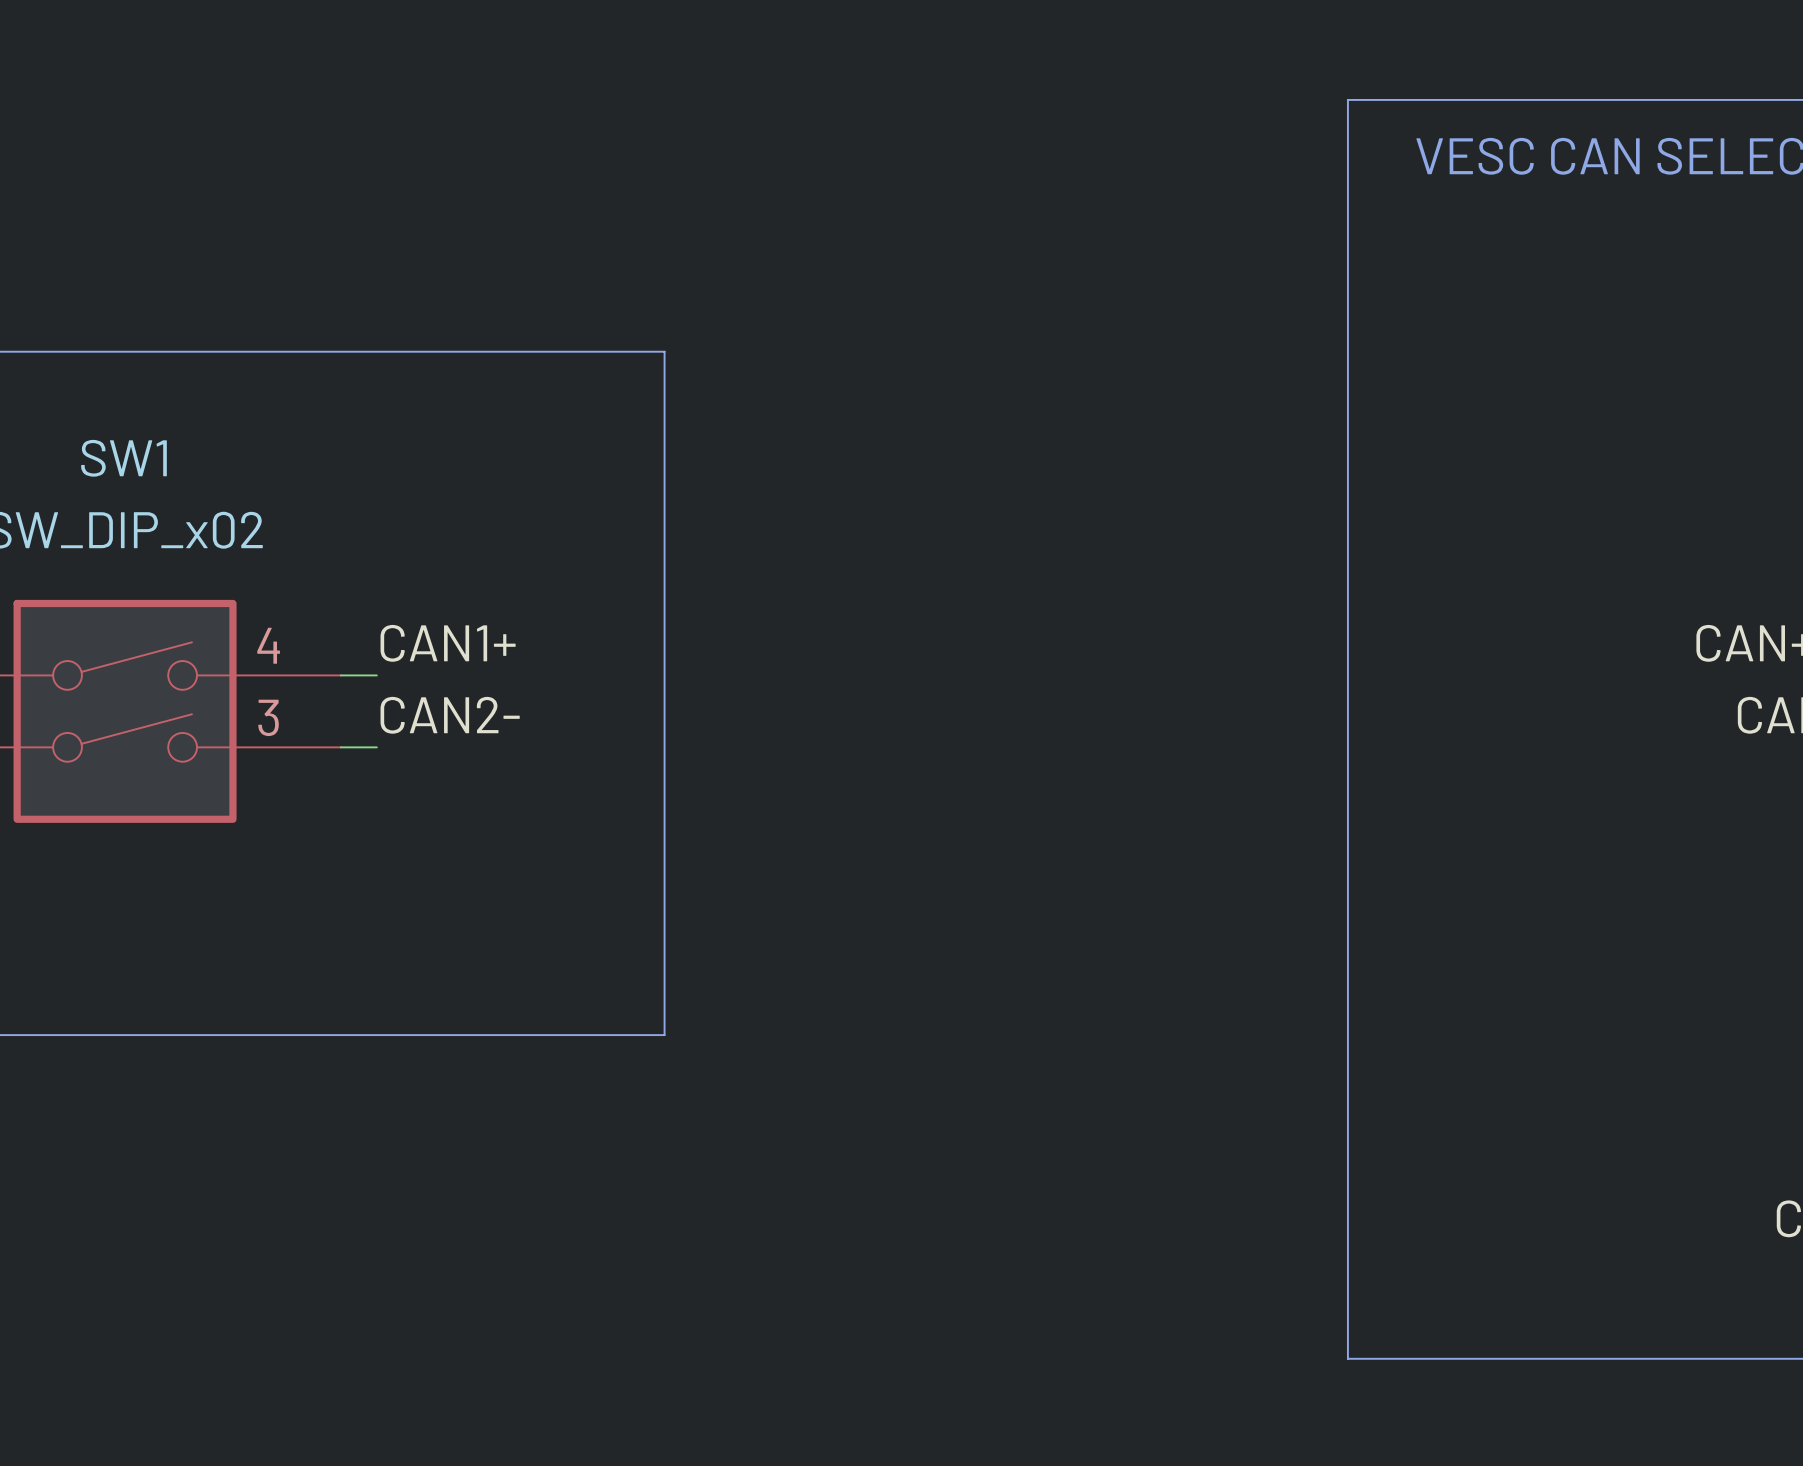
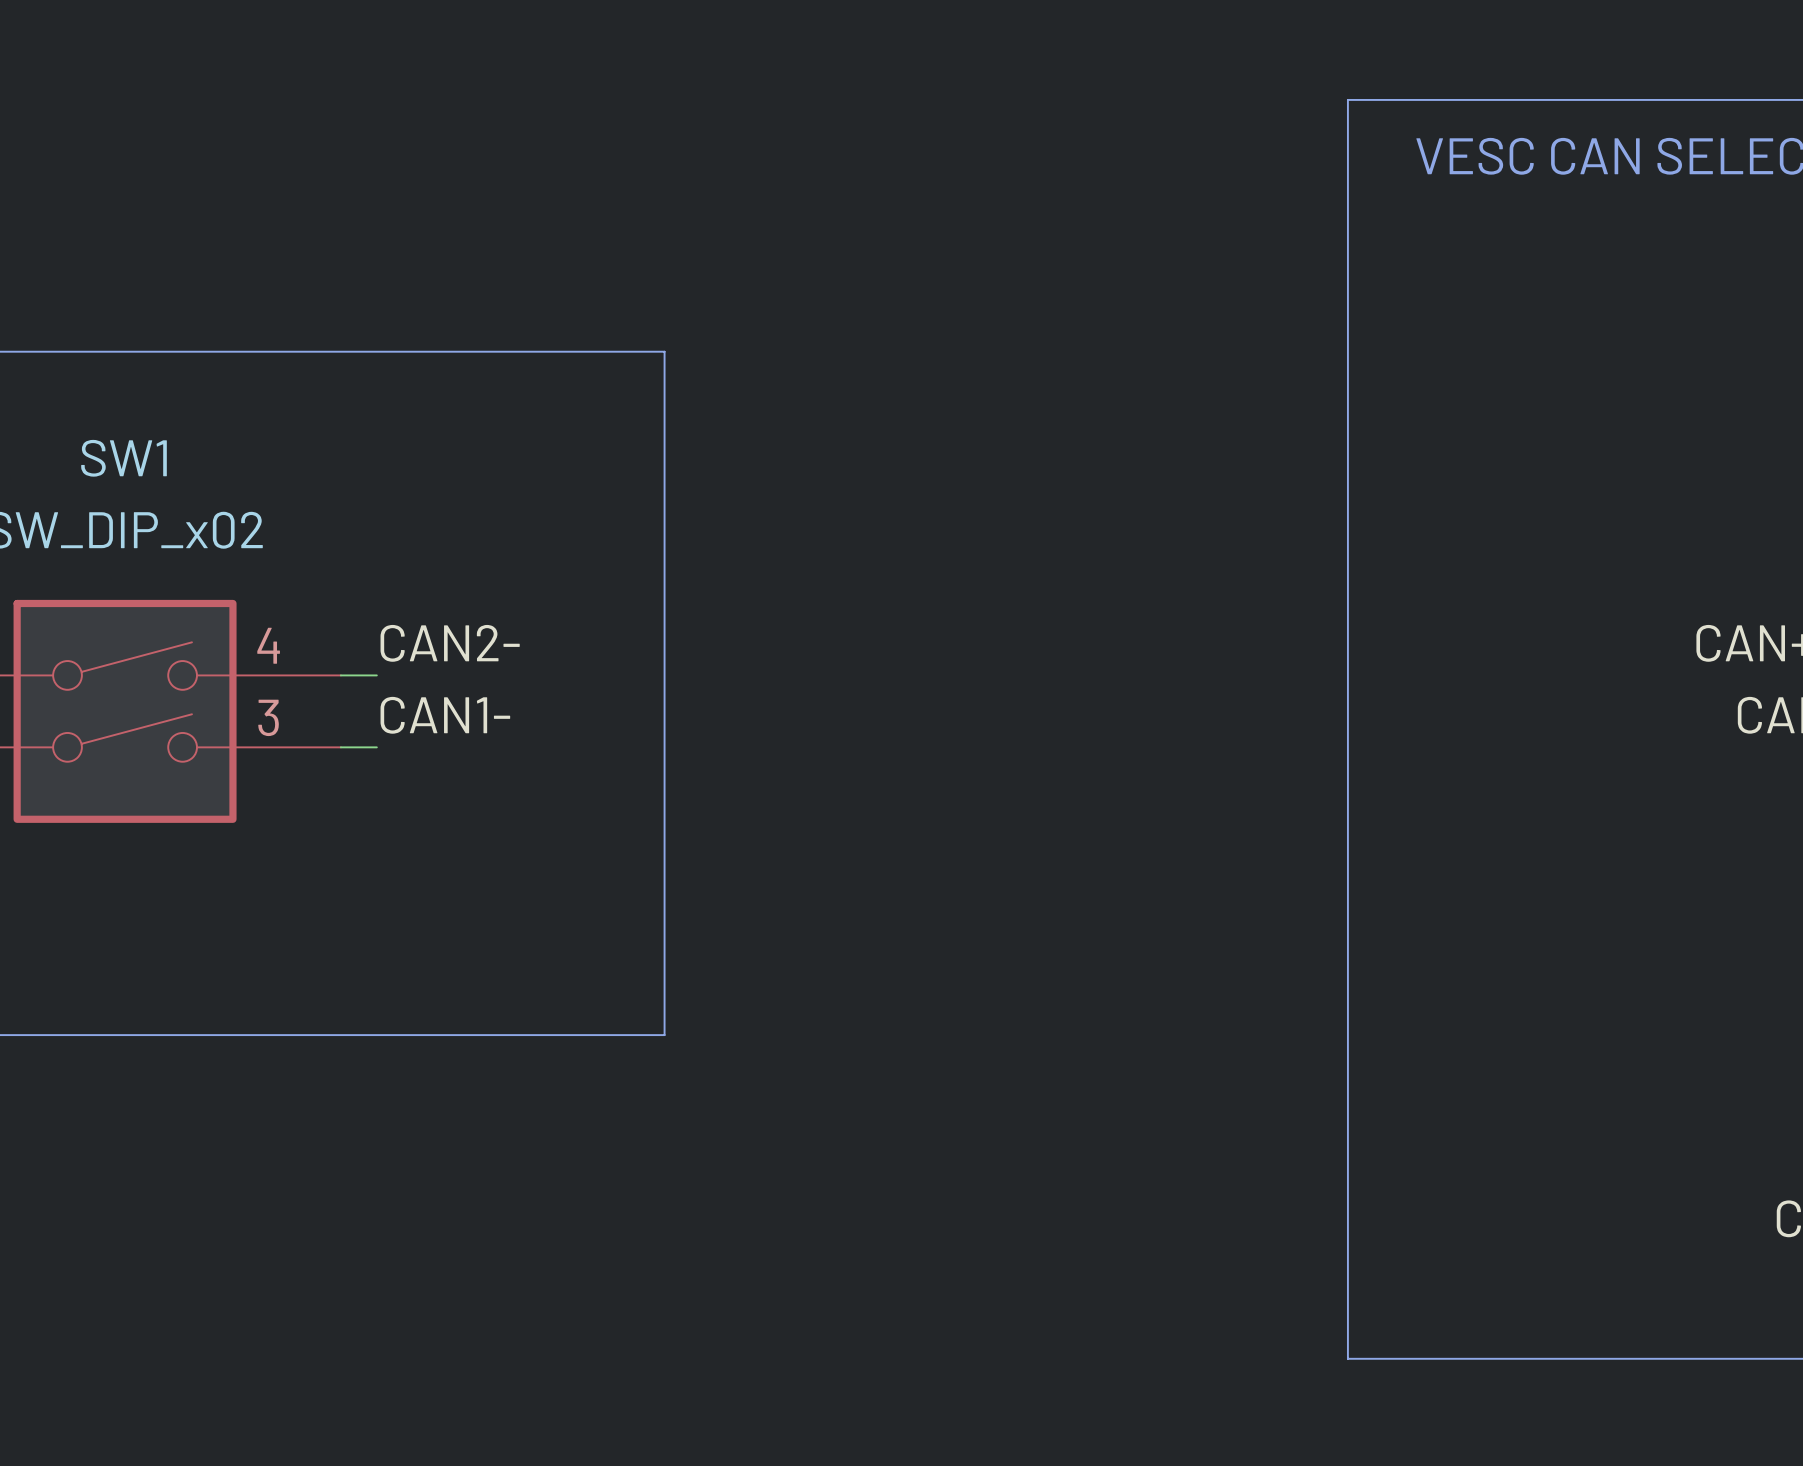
label: CAN1+ (448, 643) -> CAN2- (450, 643)
label: CAN2- (450, 715) -> CAN1- (445, 715)

